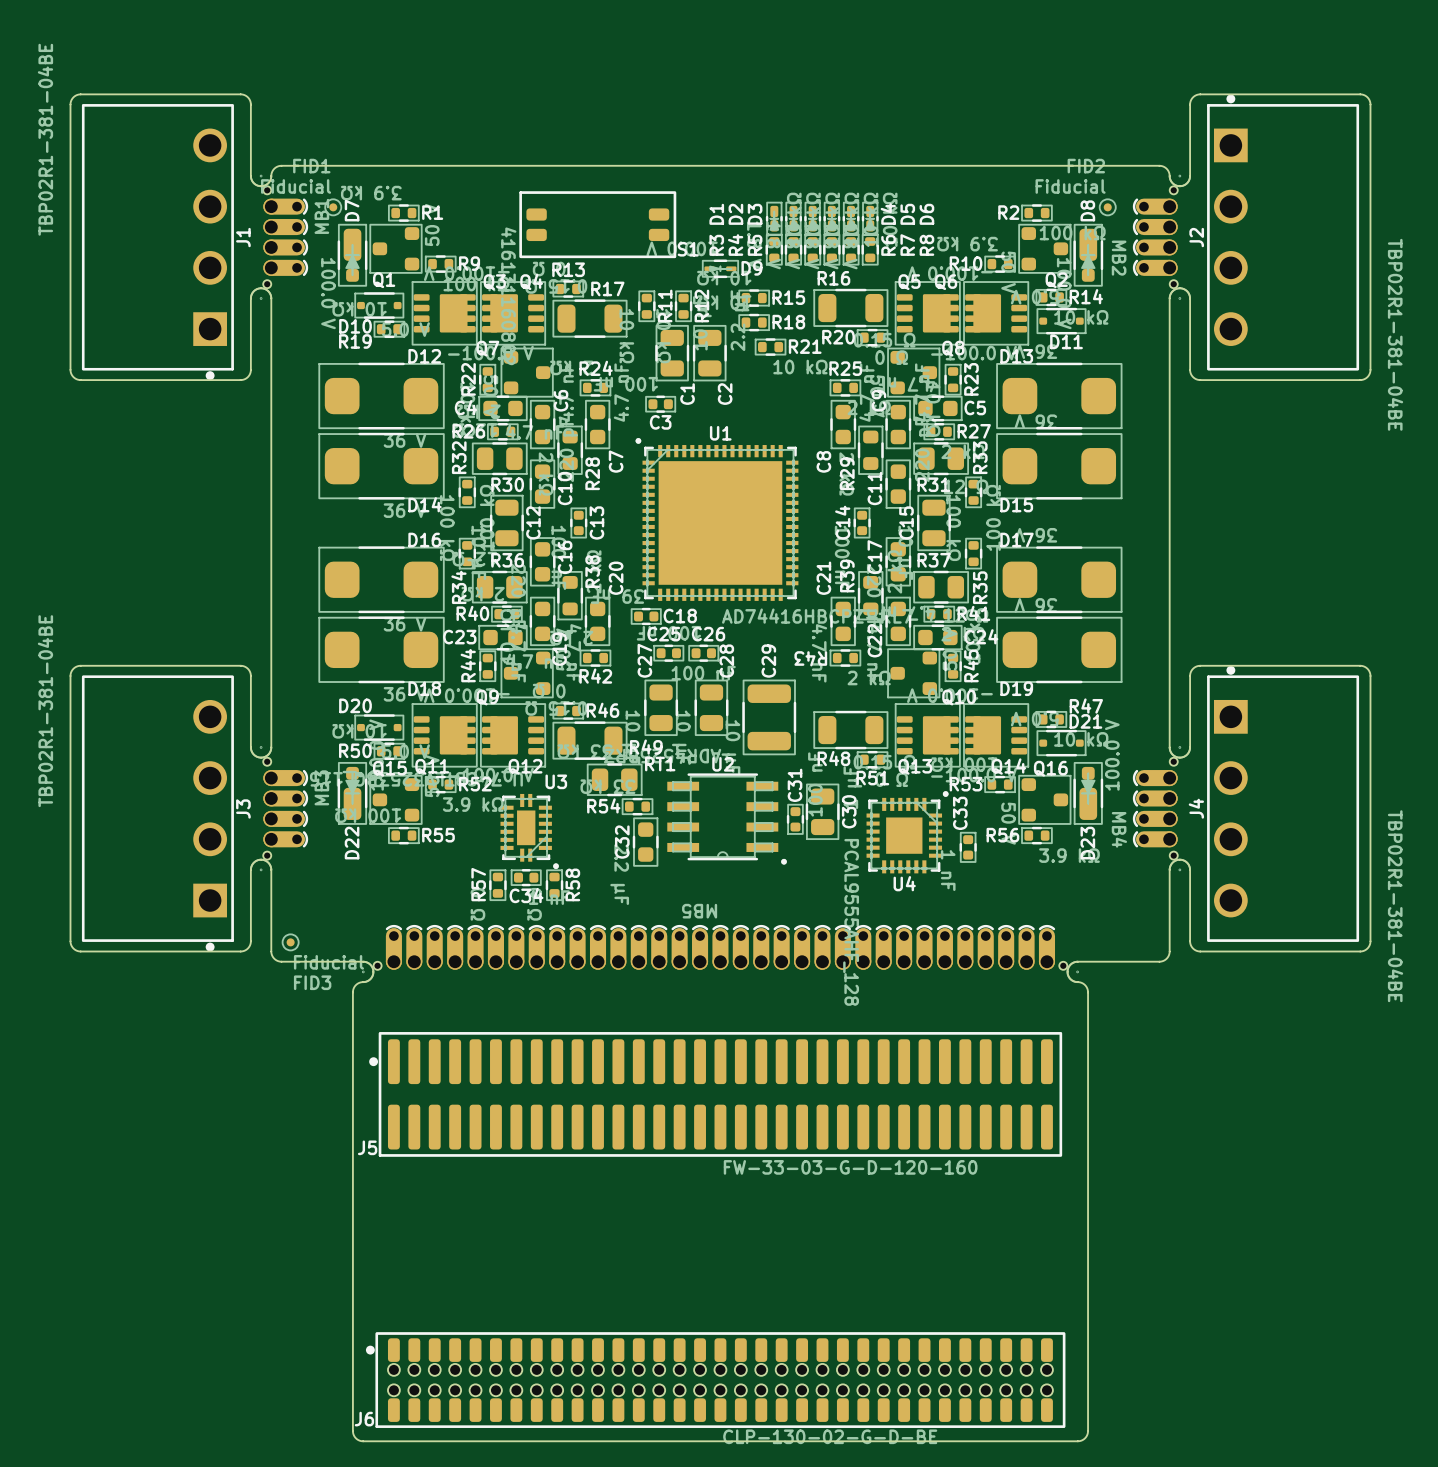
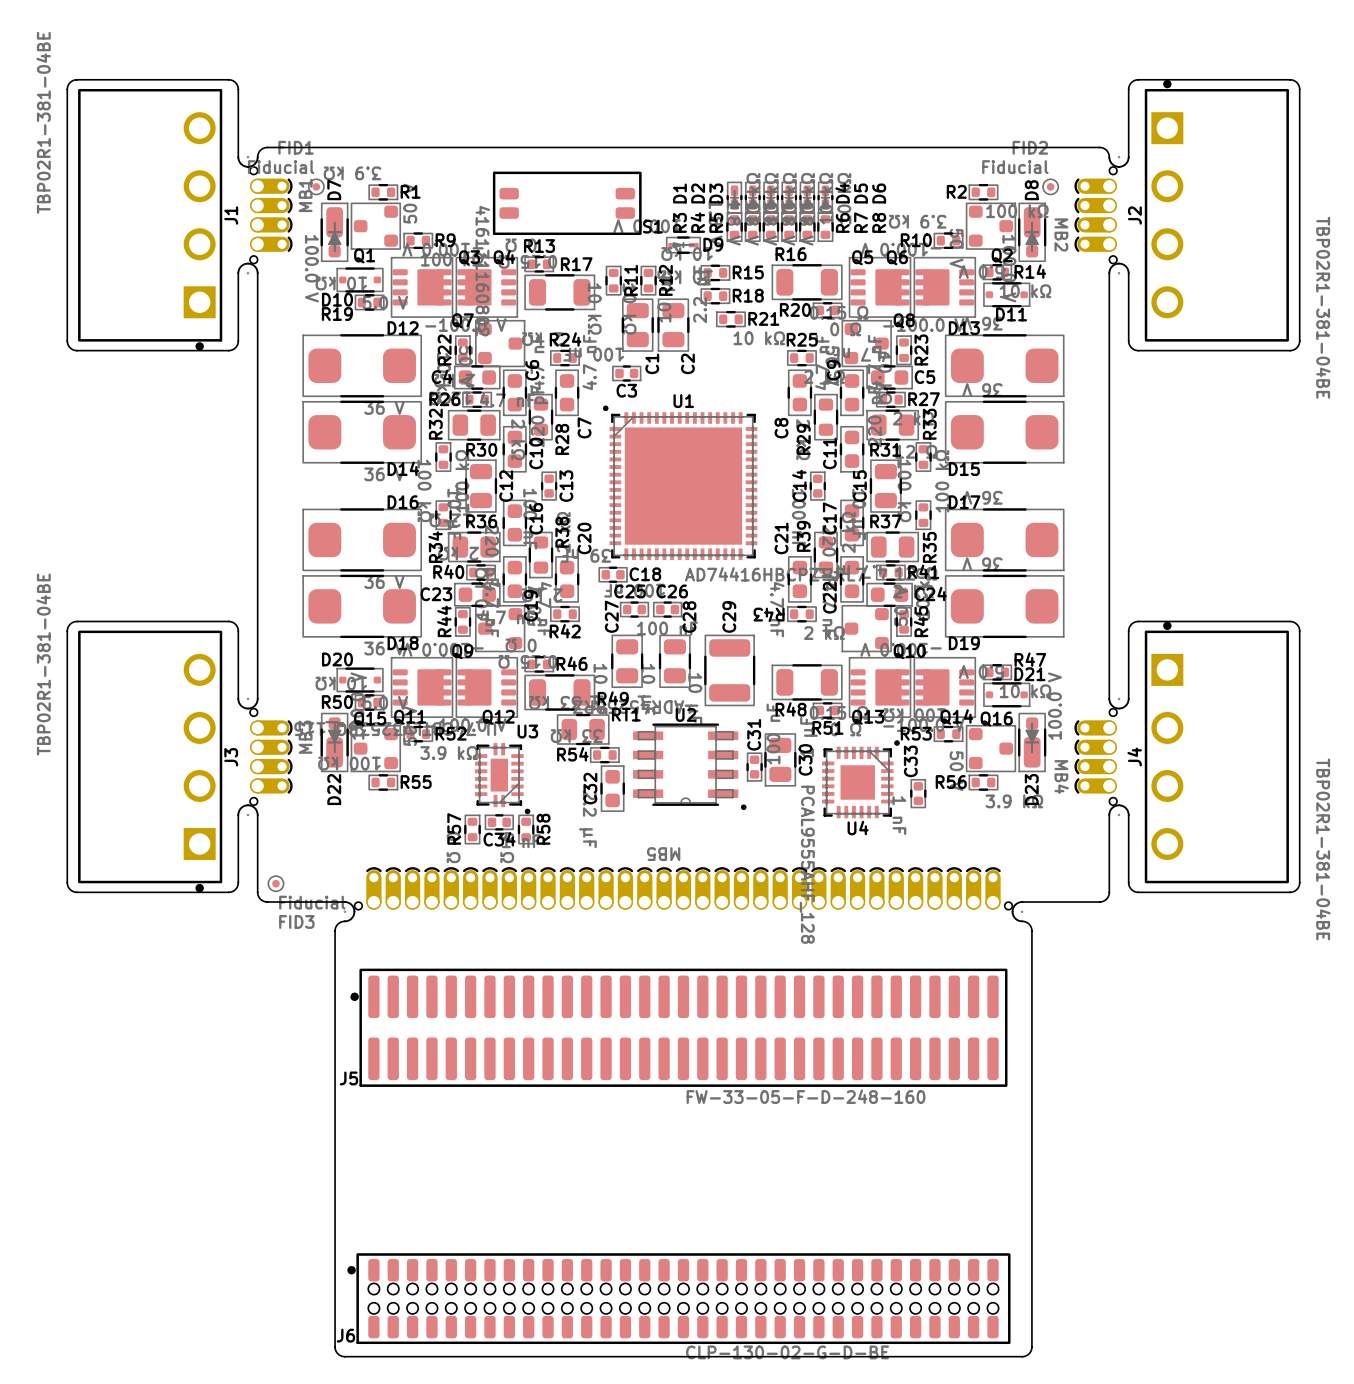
J5 value: FW-33-03-G-D-120-160 (850, 1167) -> FW-33-05-F-D-248-160 (806, 1096)

